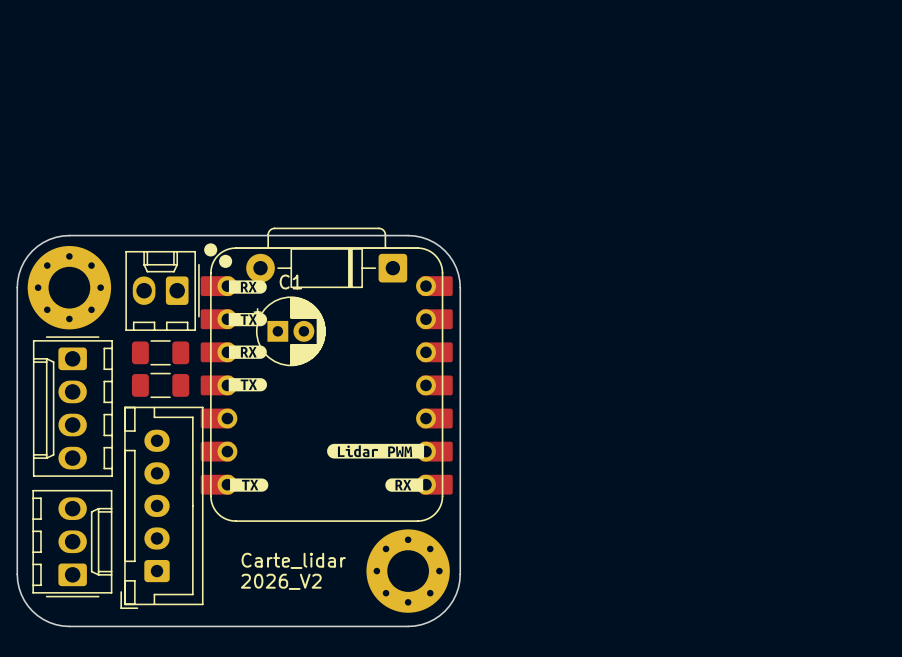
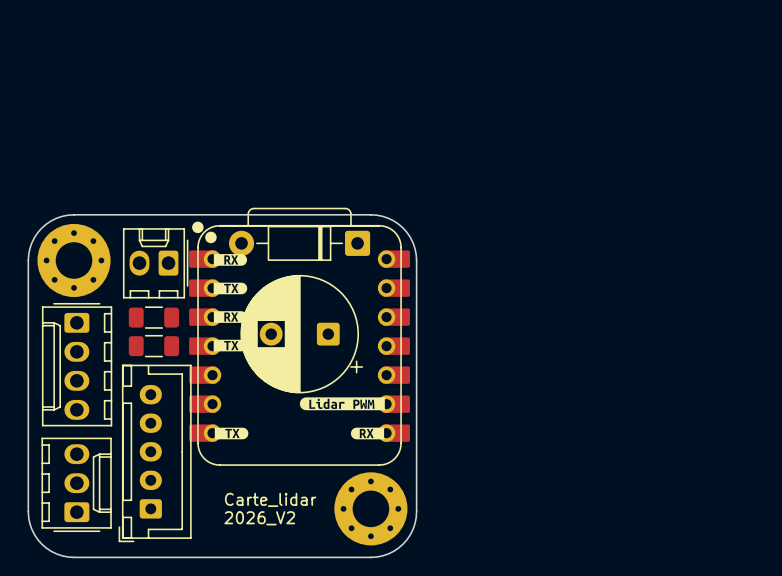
C1: (289, 331) -> none
part: none -> (301, 334)

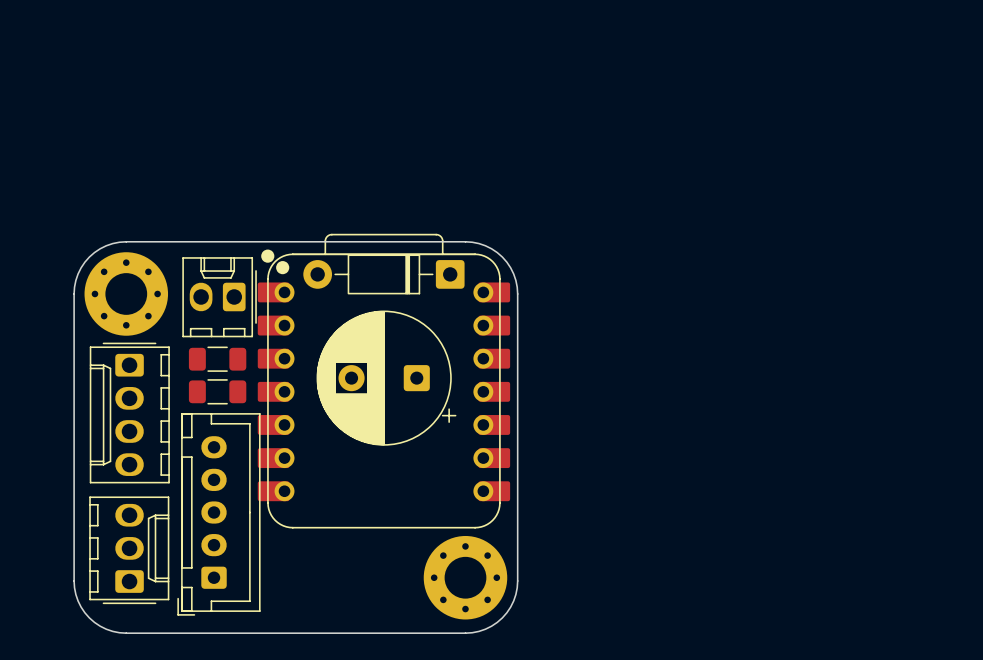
drawing: [213, 254, 248, 266] -> none
drawing: [213, 282, 248, 295] -> none
drawing: [213, 311, 248, 323] -> none
drawing: [213, 339, 248, 352] -> none
drawing: [299, 397, 385, 411] -> none
drawing: [214, 427, 249, 440] -> none
drawing: [350, 427, 385, 440] -> none
text: Carte_lidar (270, 499) -> none
text: 2026_V2 (259, 518) -> none

